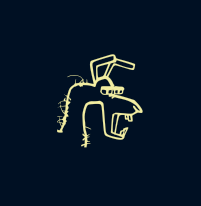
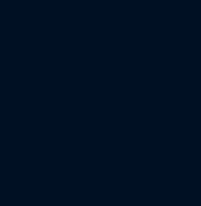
drawing: [57, 54, 143, 148] -> none

